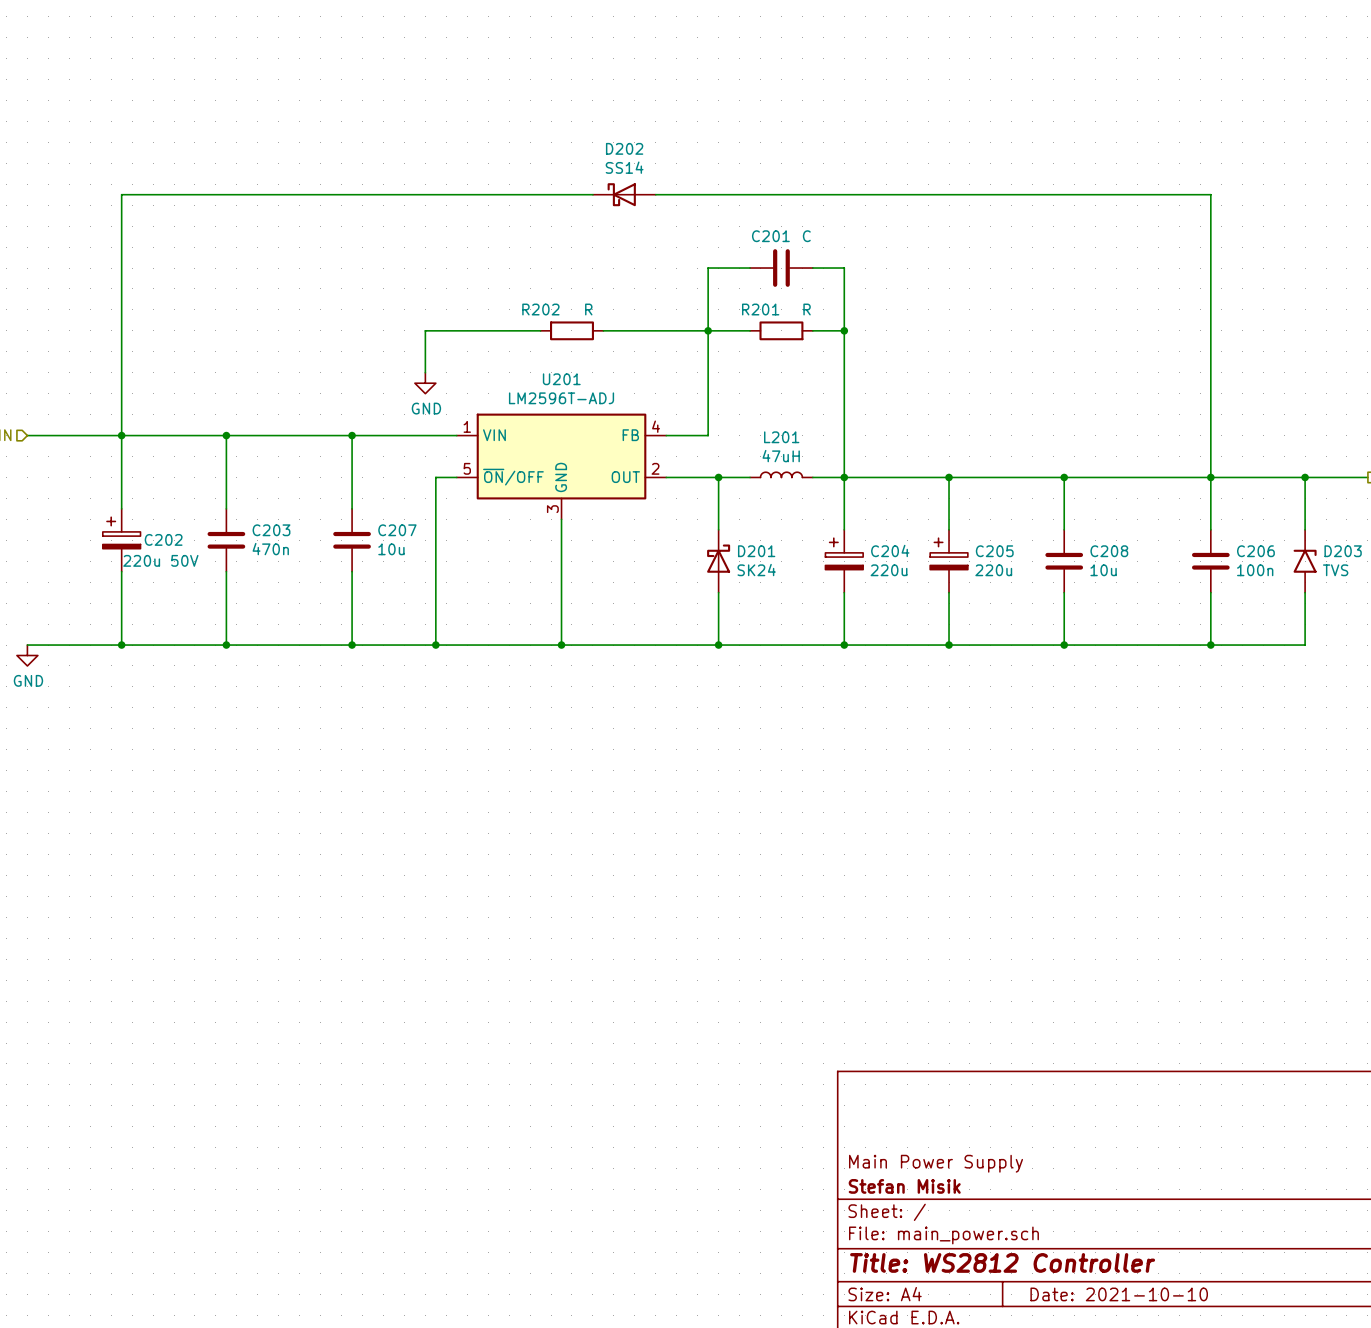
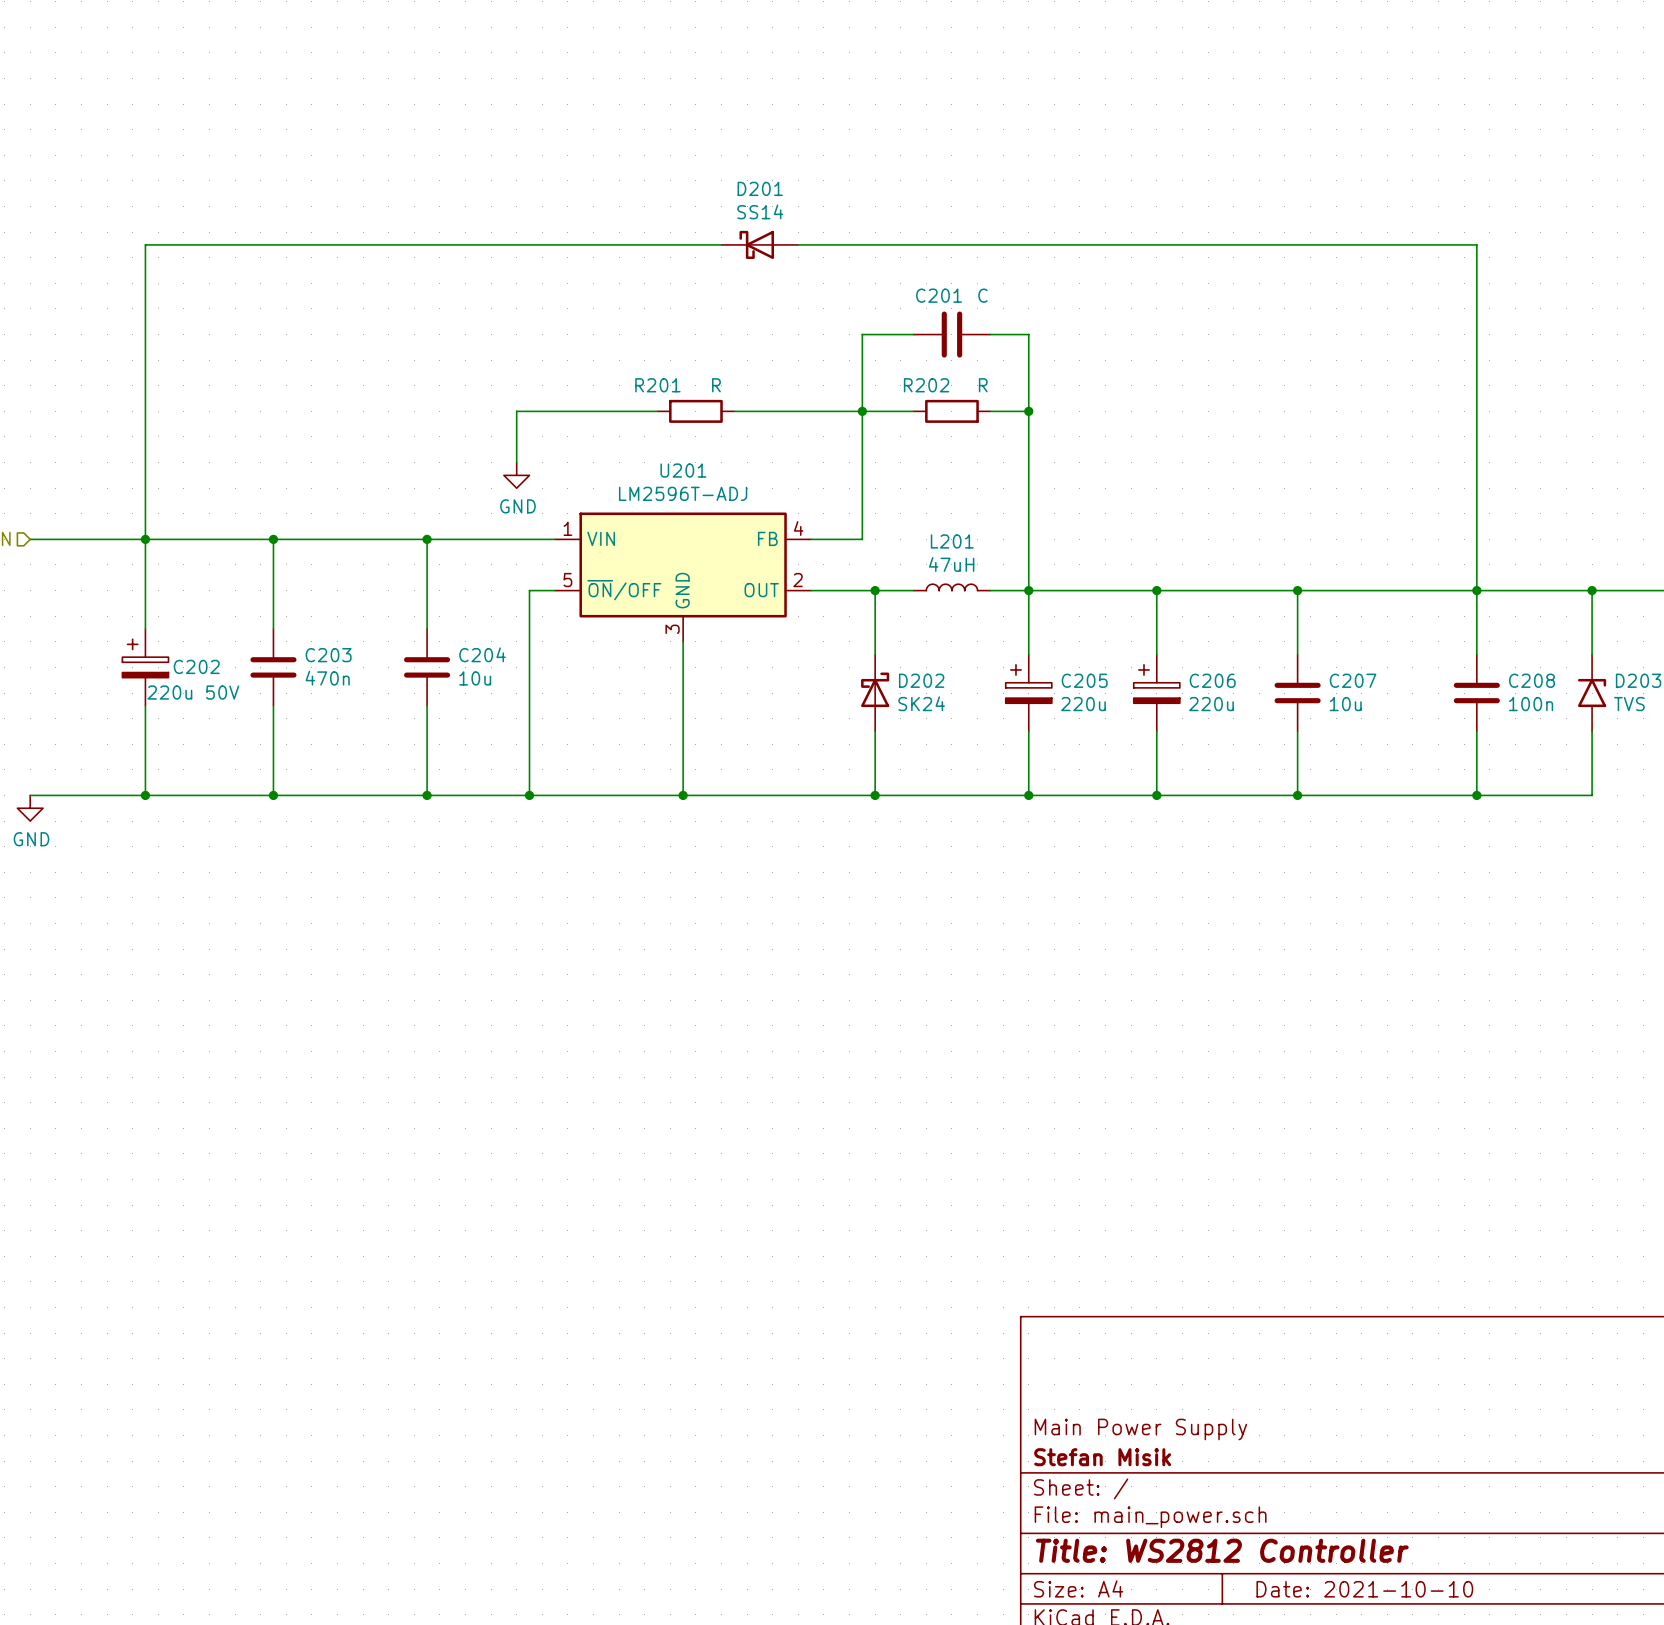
D202 name: D202 (624, 148) -> D201 (760, 188)
R202 name: R202 (540, 309) -> R201 (657, 385)
R201 name: R201 (760, 309) -> R202 (926, 385)
C207 name: C207 (397, 530) -> C204 (482, 654)
C204 name: C204 (890, 550) -> C205 (1084, 680)
D201 name: D201 (756, 551) -> D202 (921, 680)
C205 name: C205 (994, 551) -> C206 (1212, 680)
C208 name: C208 (1109, 551) -> C207 (1353, 680)
C206 name: C206 (1255, 551) -> C208 (1531, 680)

